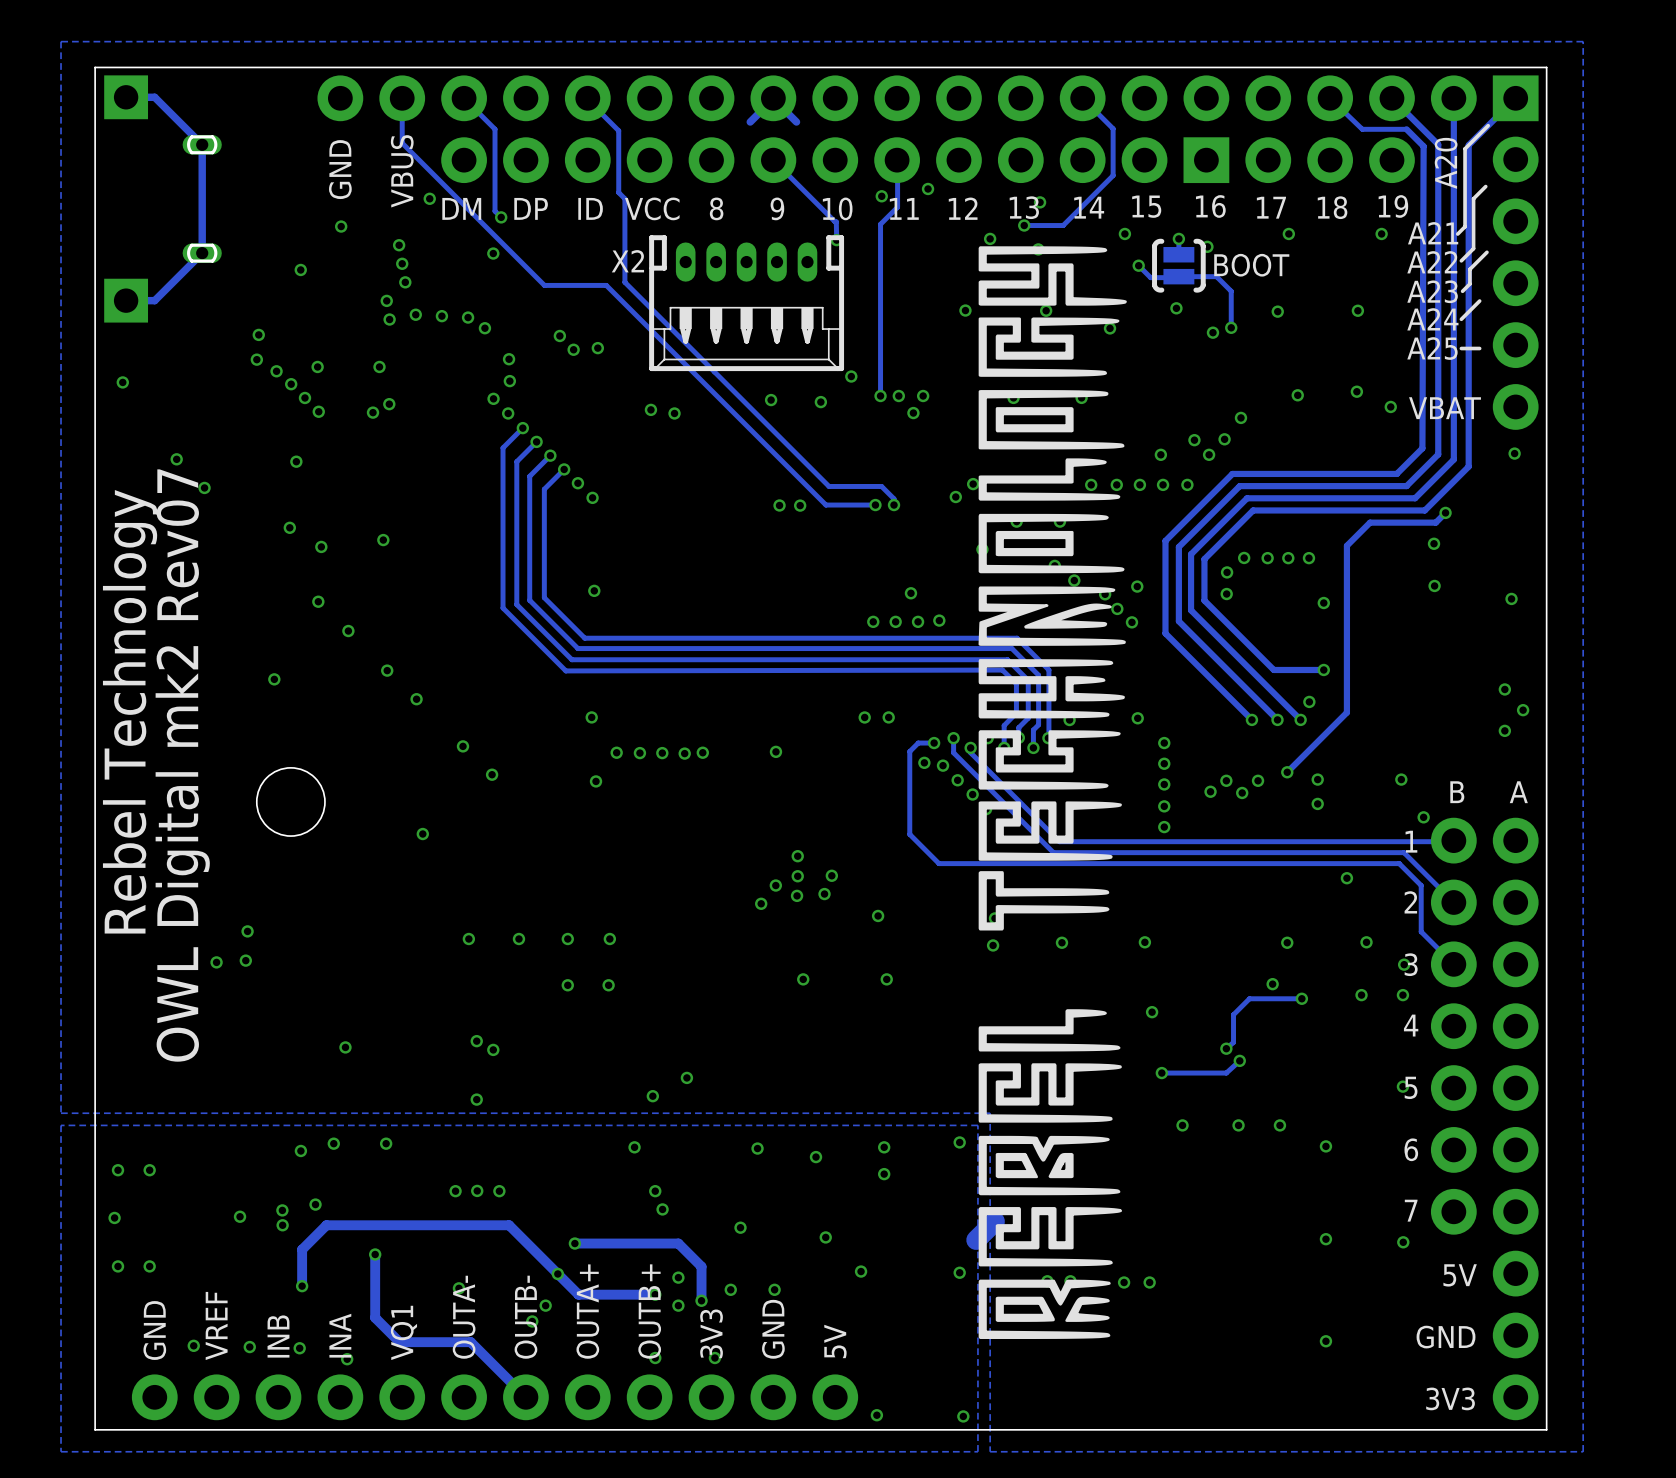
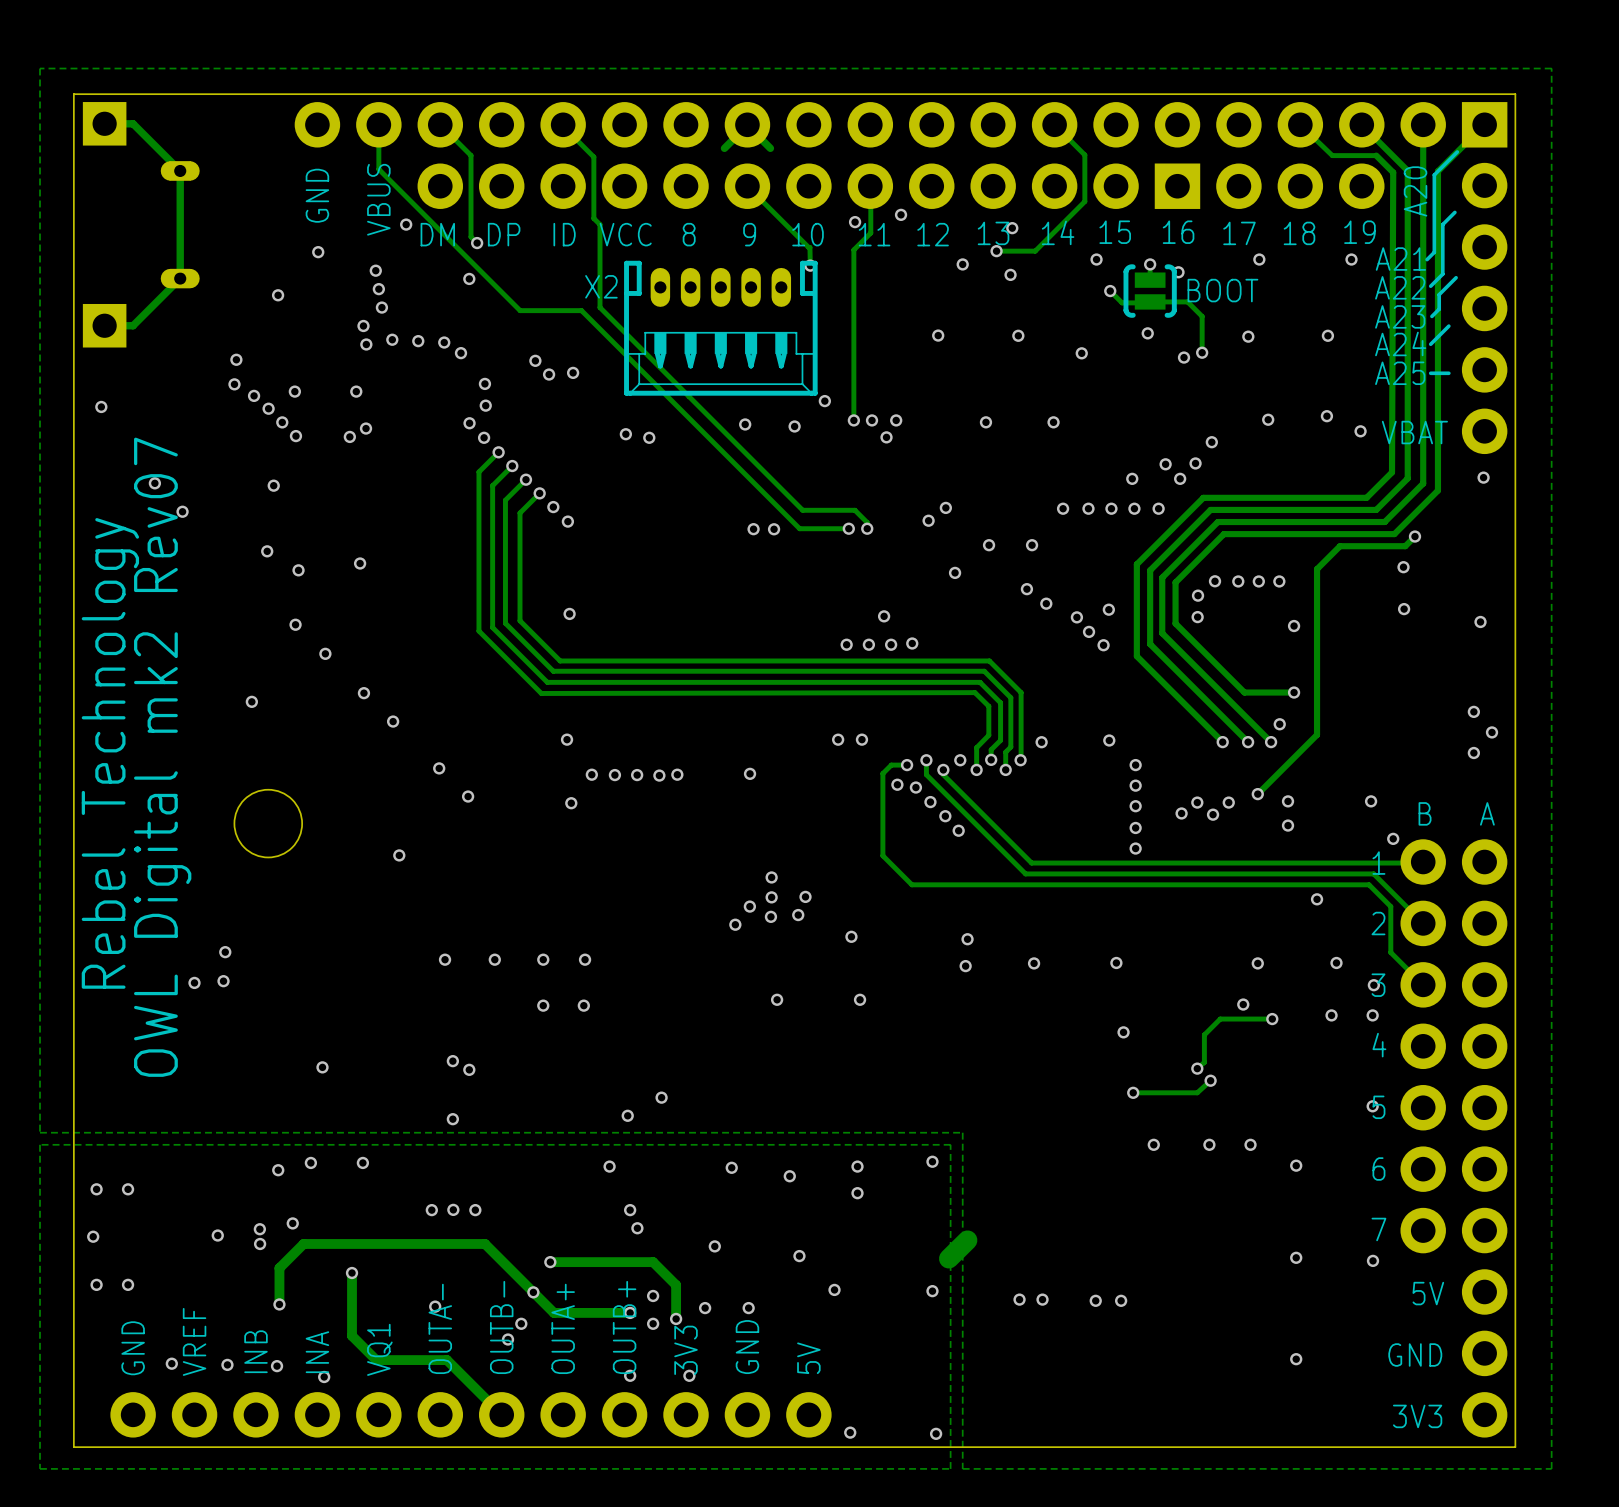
drawing: [978, 246, 1127, 931] -> none
drawing: [978, 1009, 1123, 1340] -> none

